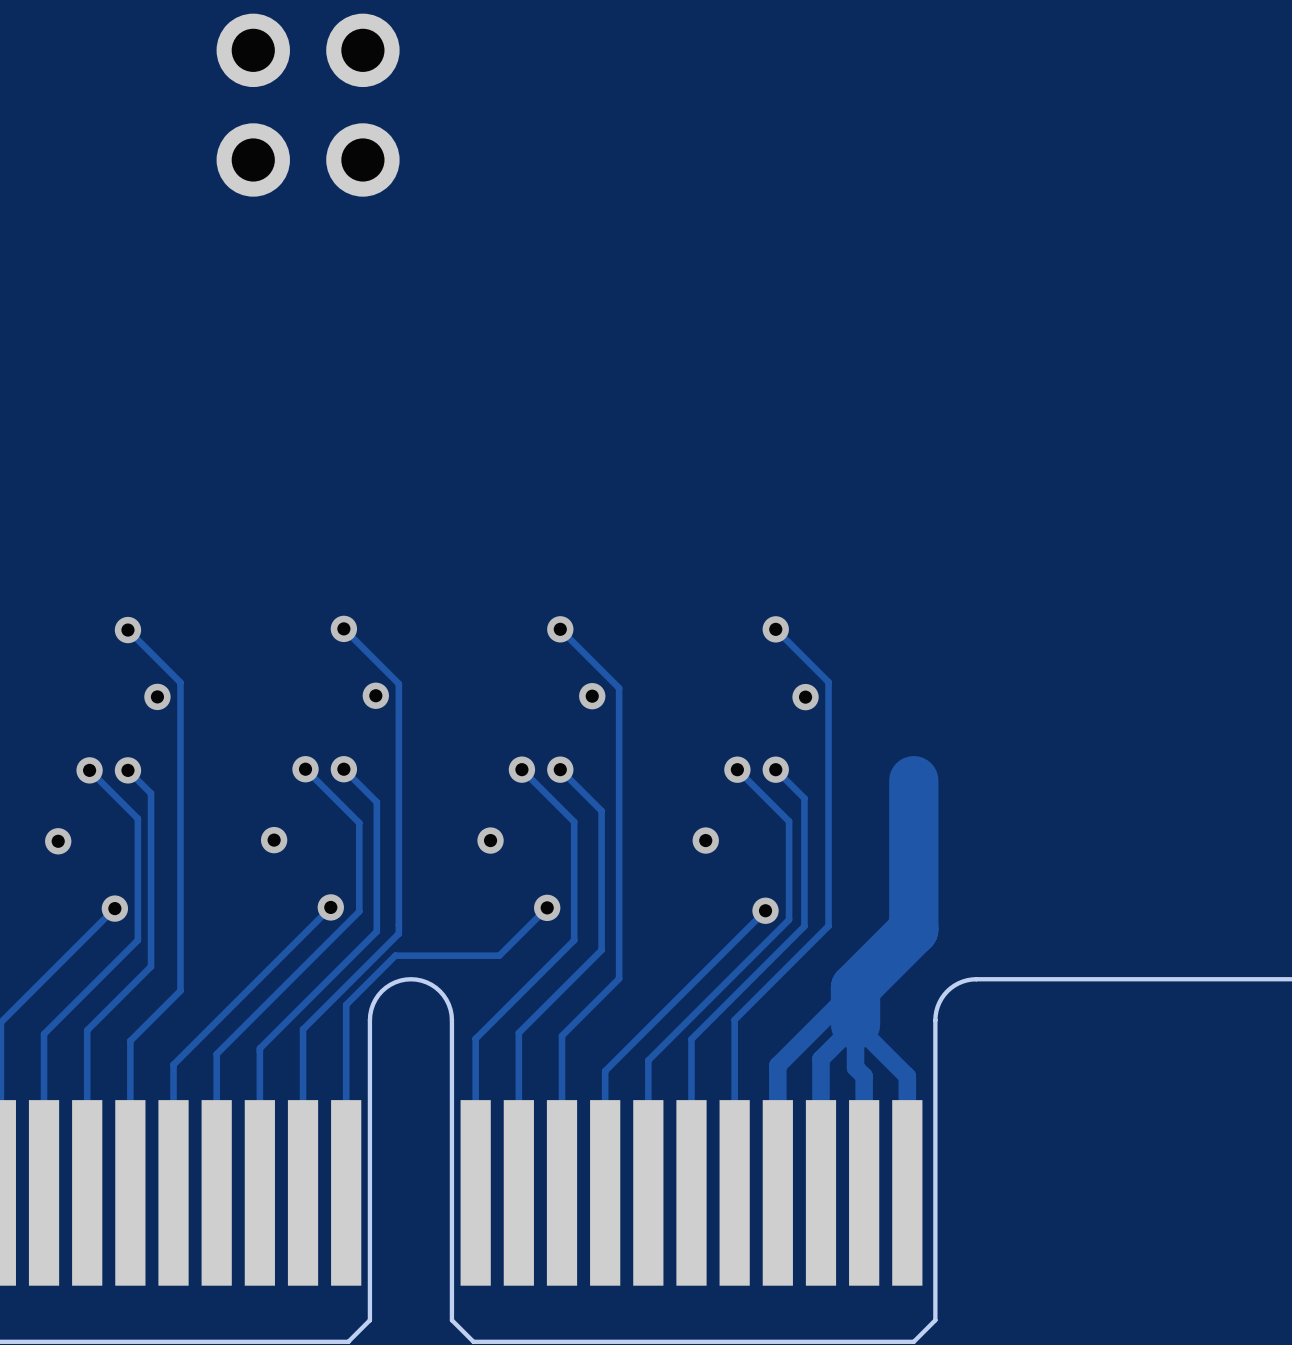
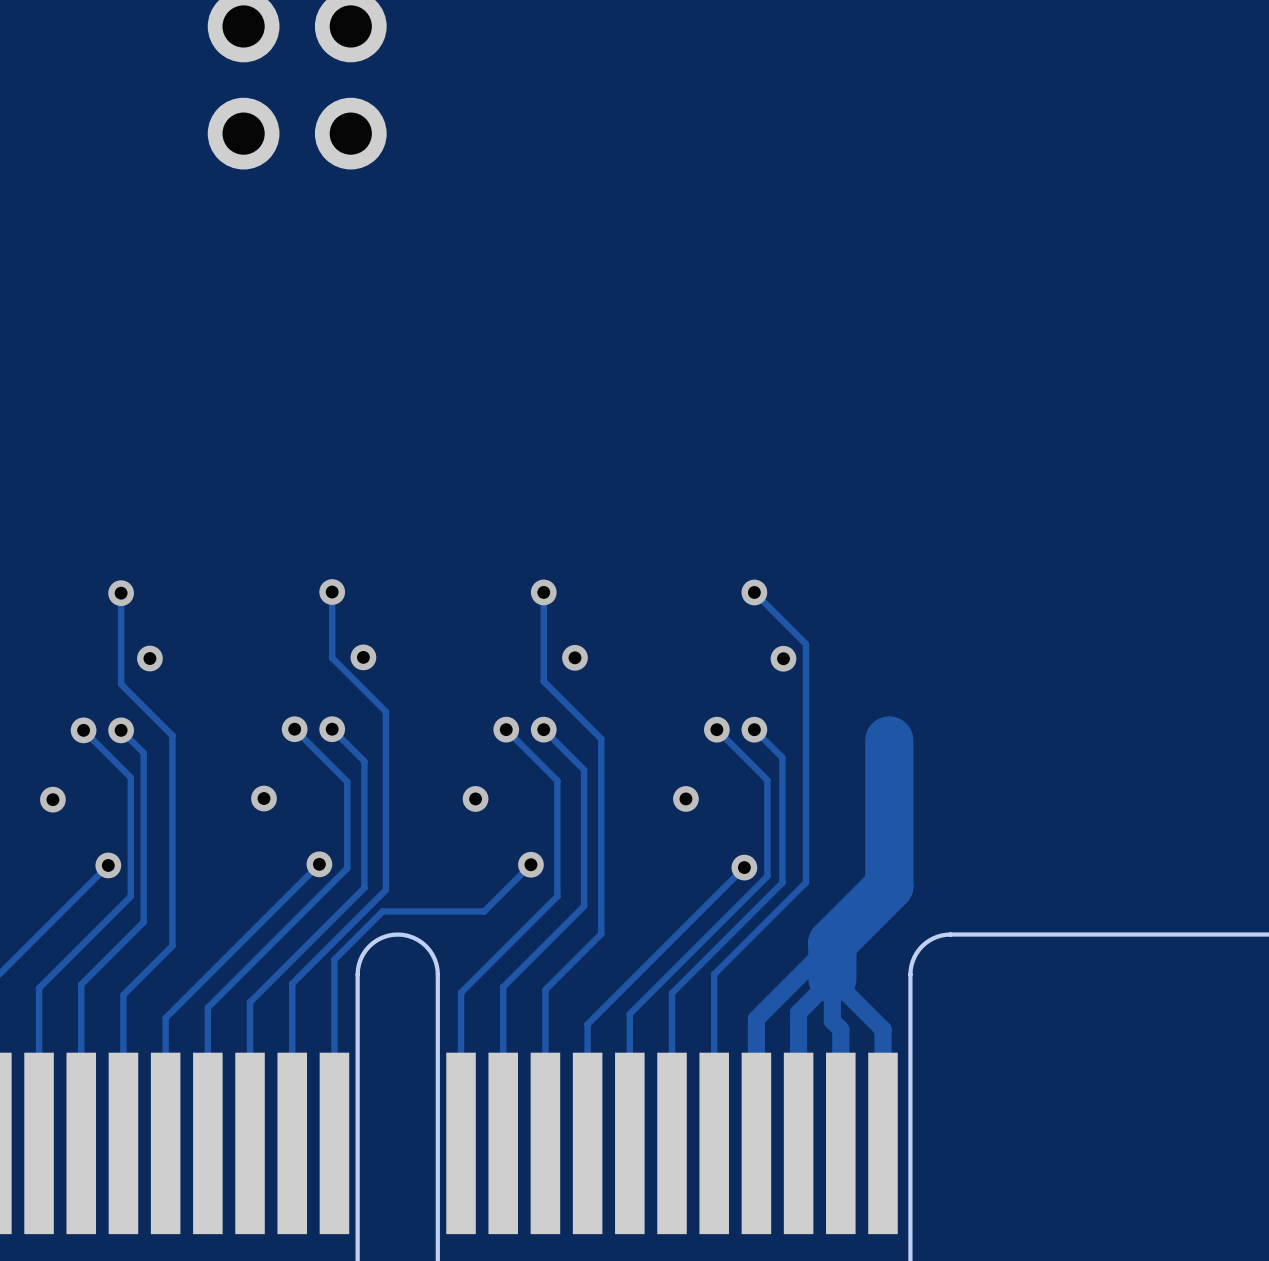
track: (343, 628) (398, 683) (398, 751) -> (332, 592) (332, 658) (385, 711)
track: (560, 629) (619, 688) (619, 779) -> (543, 592) (543, 681) (601, 738)
track: (127, 630) (180, 682) (180, 775) -> (121, 593) (121, 684) (172, 735)

